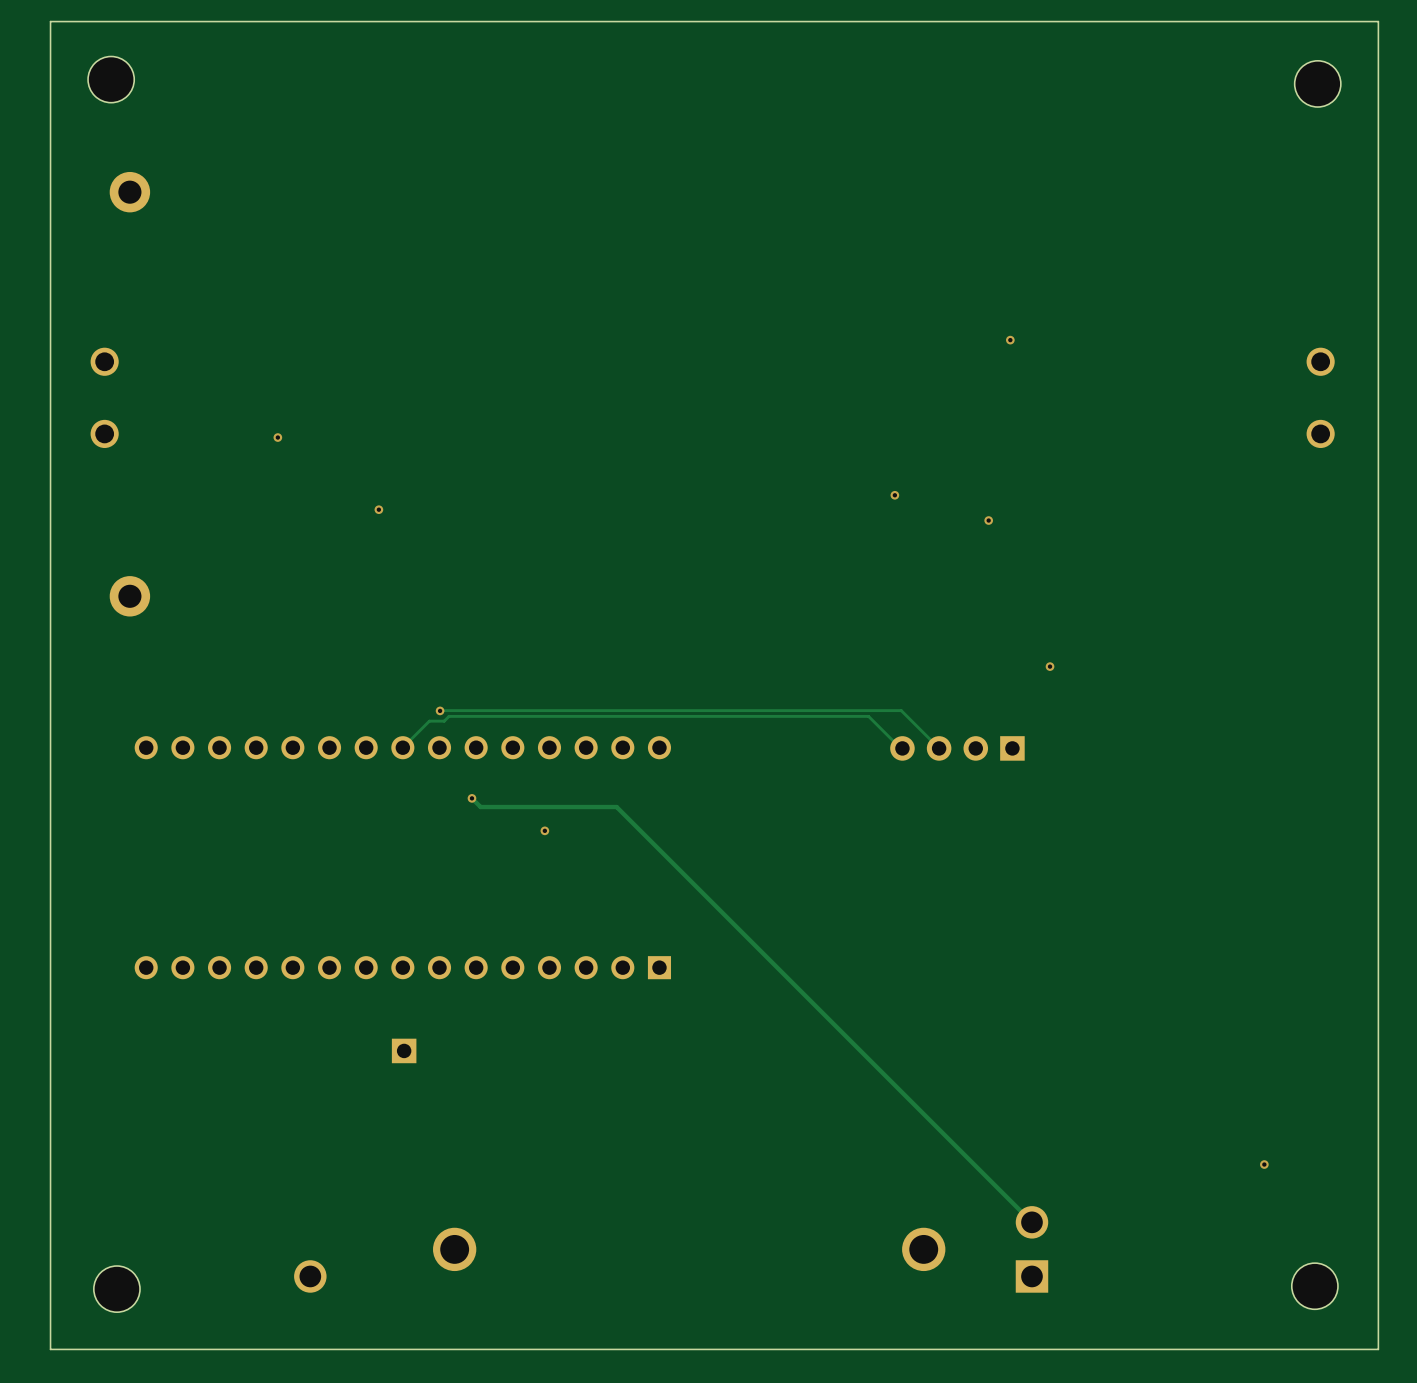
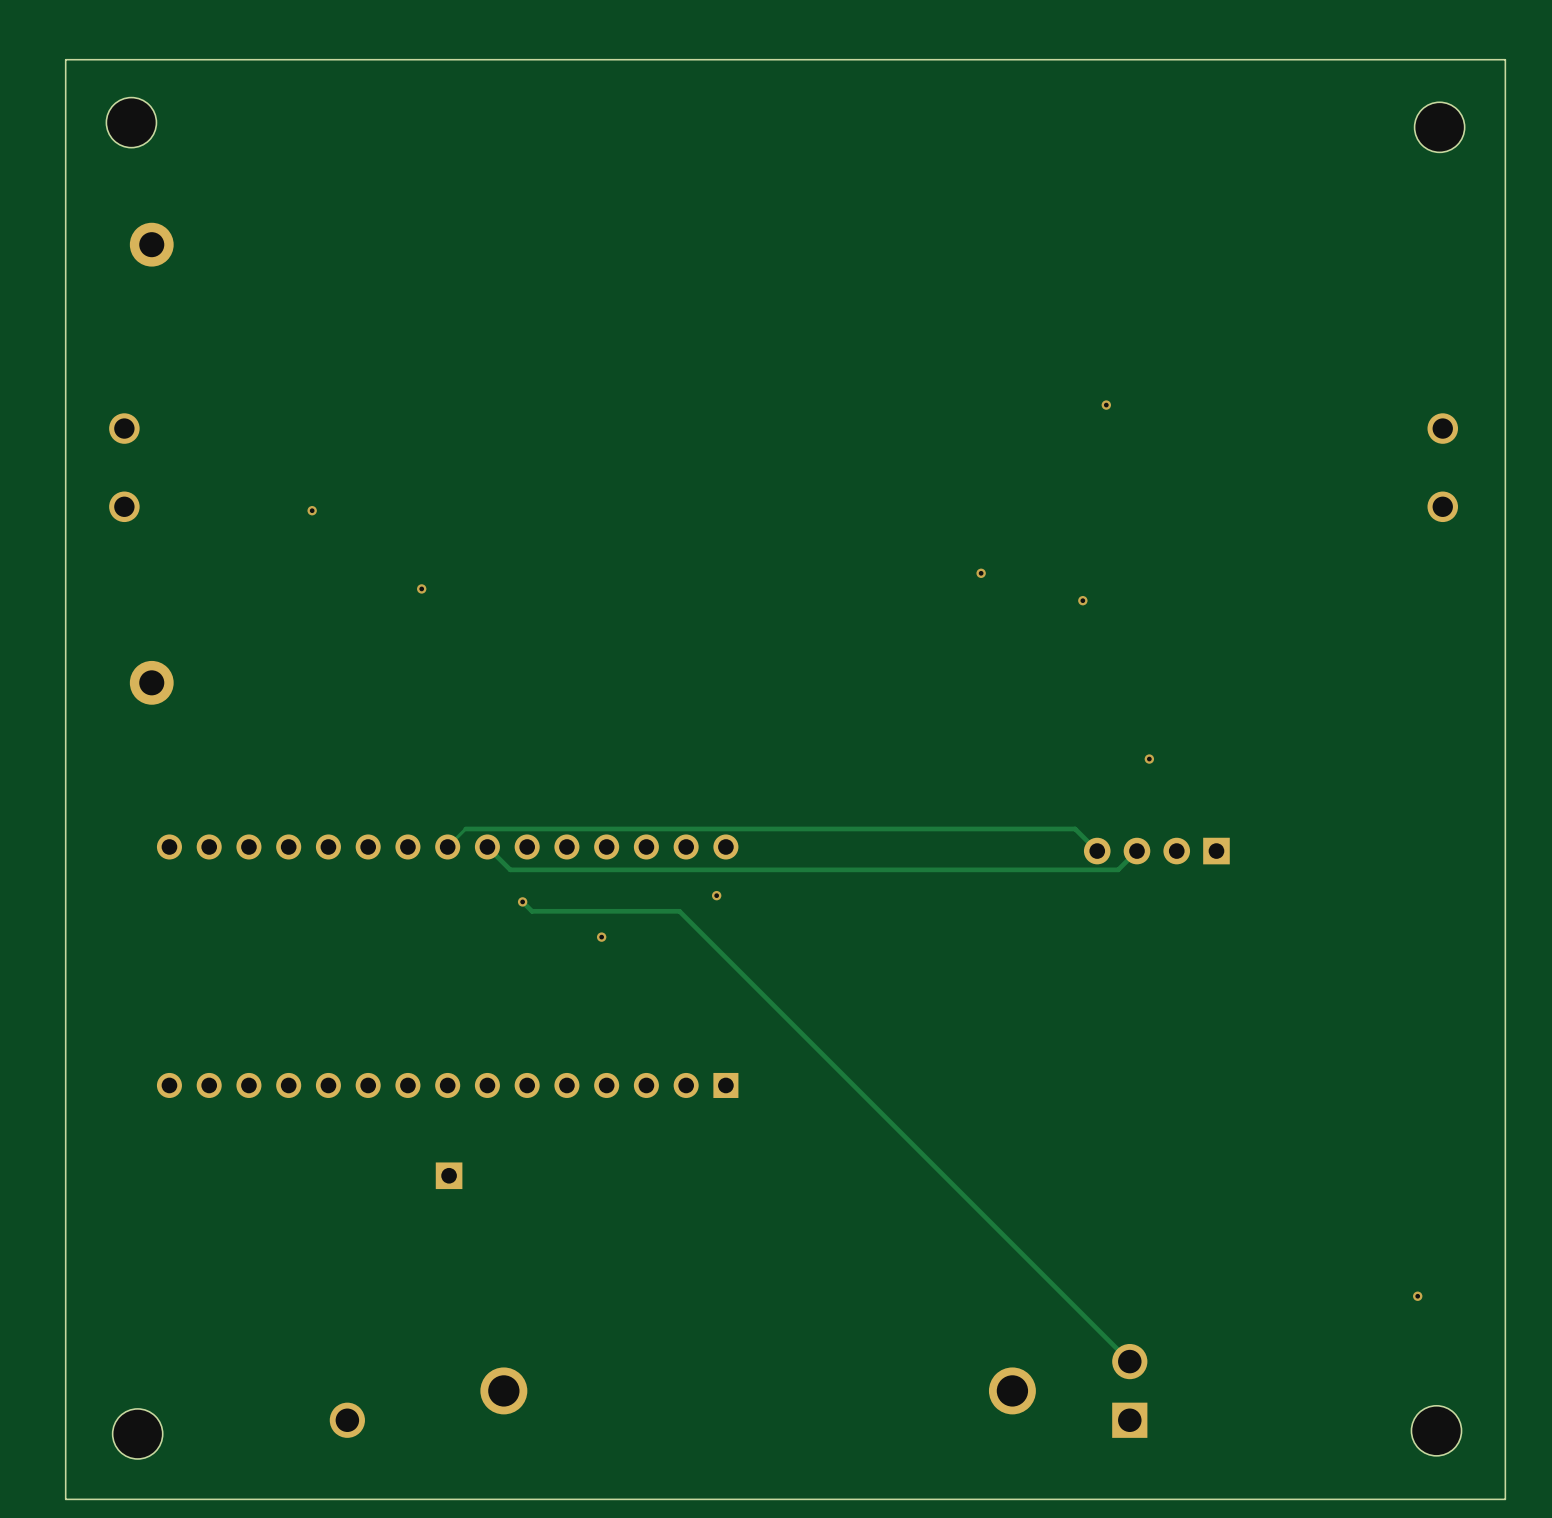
track: (440, 710) (901, 710) (939, 748) -> none
via: (440, 710) -> none
track: (419, 731) (429, 721) (444, 721) (449, 716) (868, 716) (902, 748) -> (465, 828) (1075, 828) (1097, 851)
track: none -> (487, 846) (510, 869) (1118, 869) (1136, 851)
part position: (957, 748) -> (1156, 851)
via: none -> (716, 895)
via position: (1264, 1164) -> (1417, 1296)

